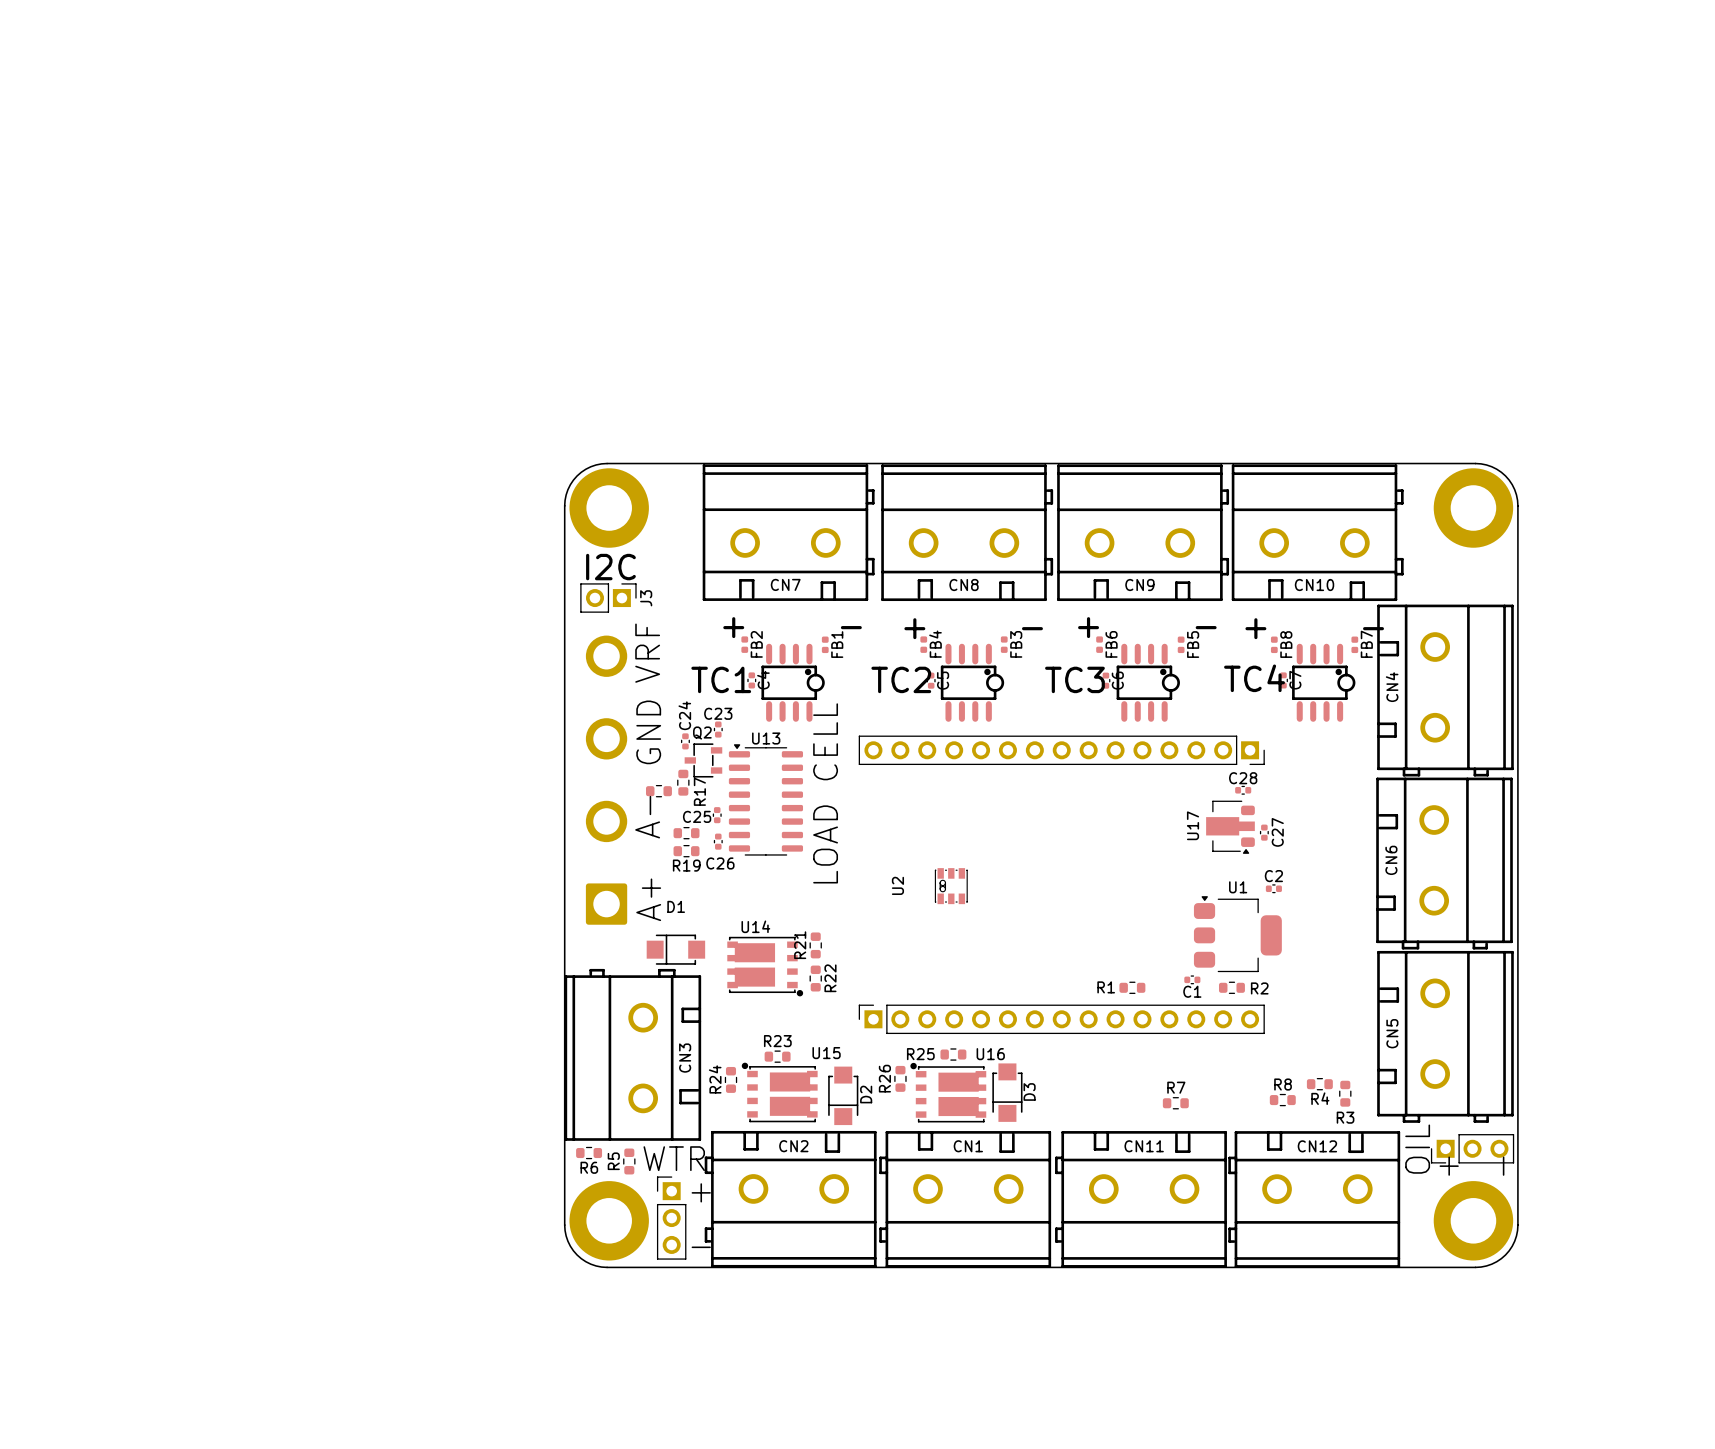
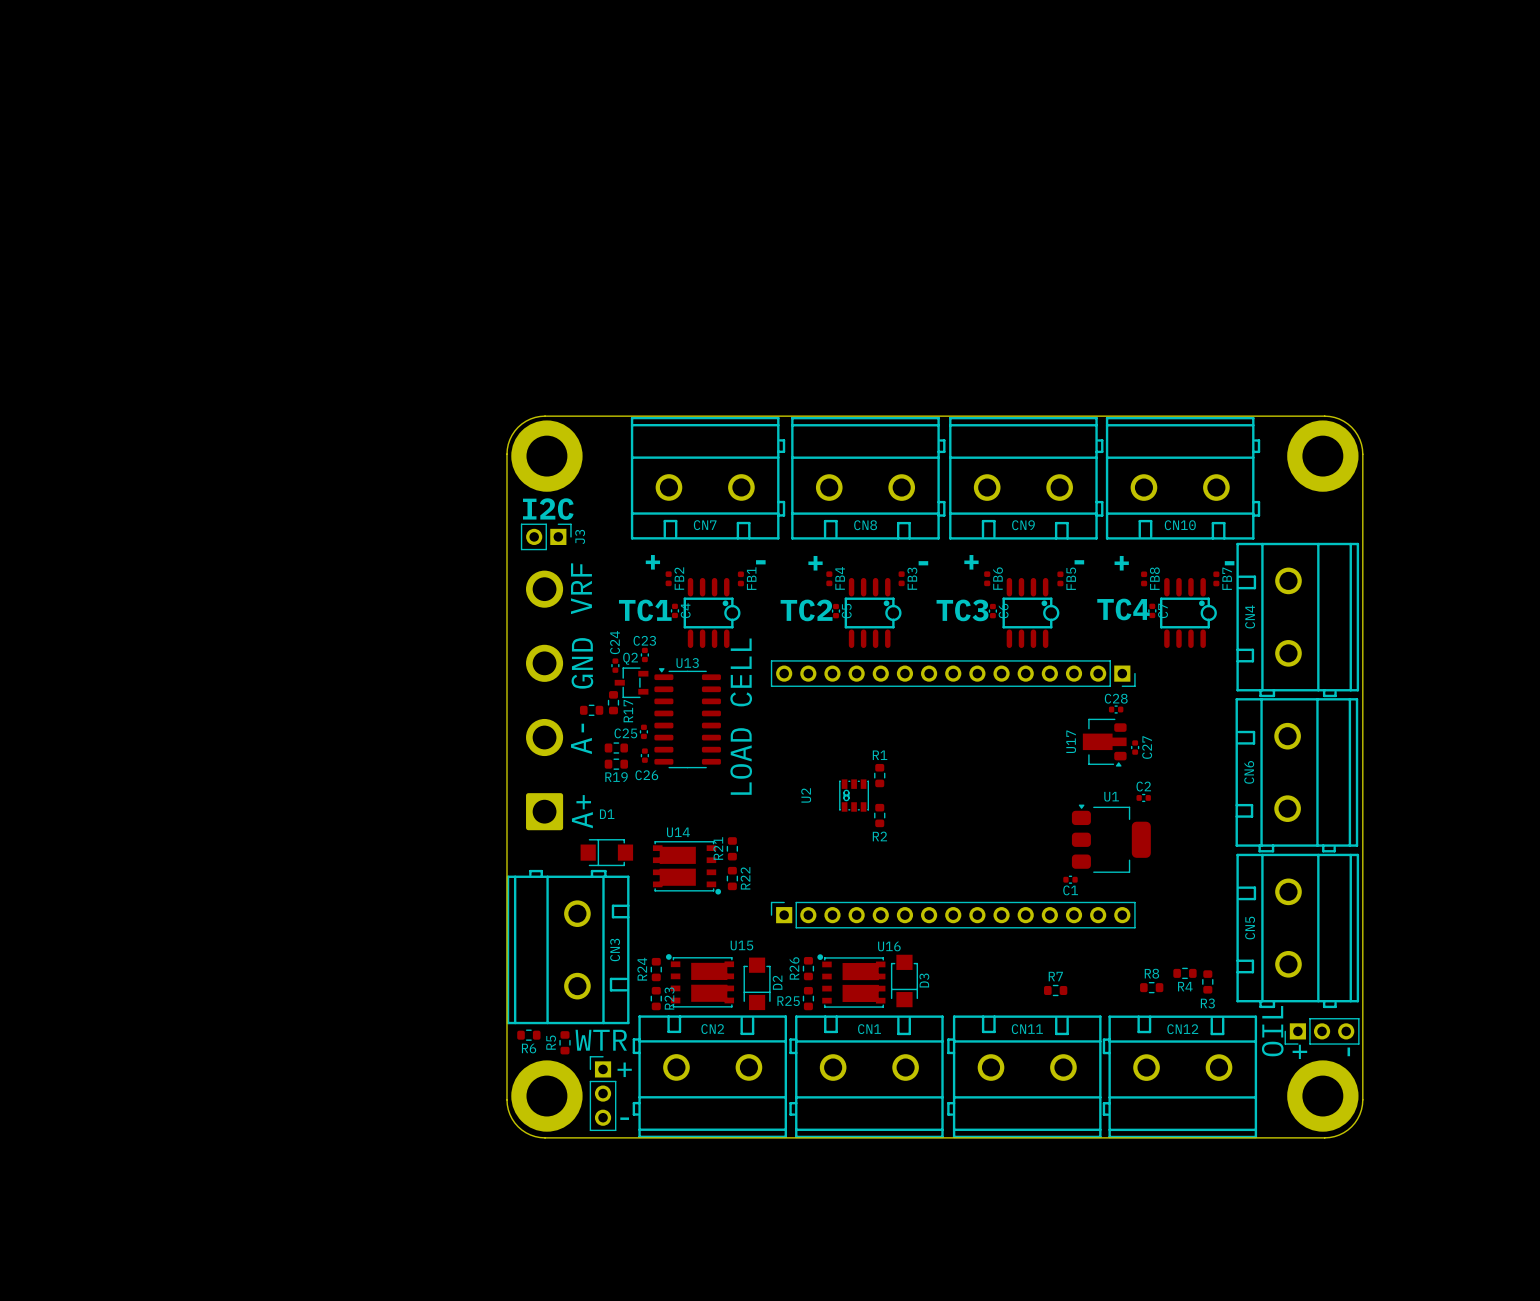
R1 rotation: 0° (1132, 987) -> 90° clockwise (879, 775)
R1 position: (1132, 987) -> (879, 775)
R2 rotation: 0° (1231, 987) -> 90° clockwise (879, 815)
R2 position: (1231, 987) -> (879, 815)
R25 rotation: 0° (953, 1054) -> 90° clockwise (808, 998)
R25 position: (953, 1054) -> (808, 998)
R23 rotation: 0° (777, 1056) -> 90° clockwise (656, 998)
R23 position: (777, 1056) -> (656, 998)

